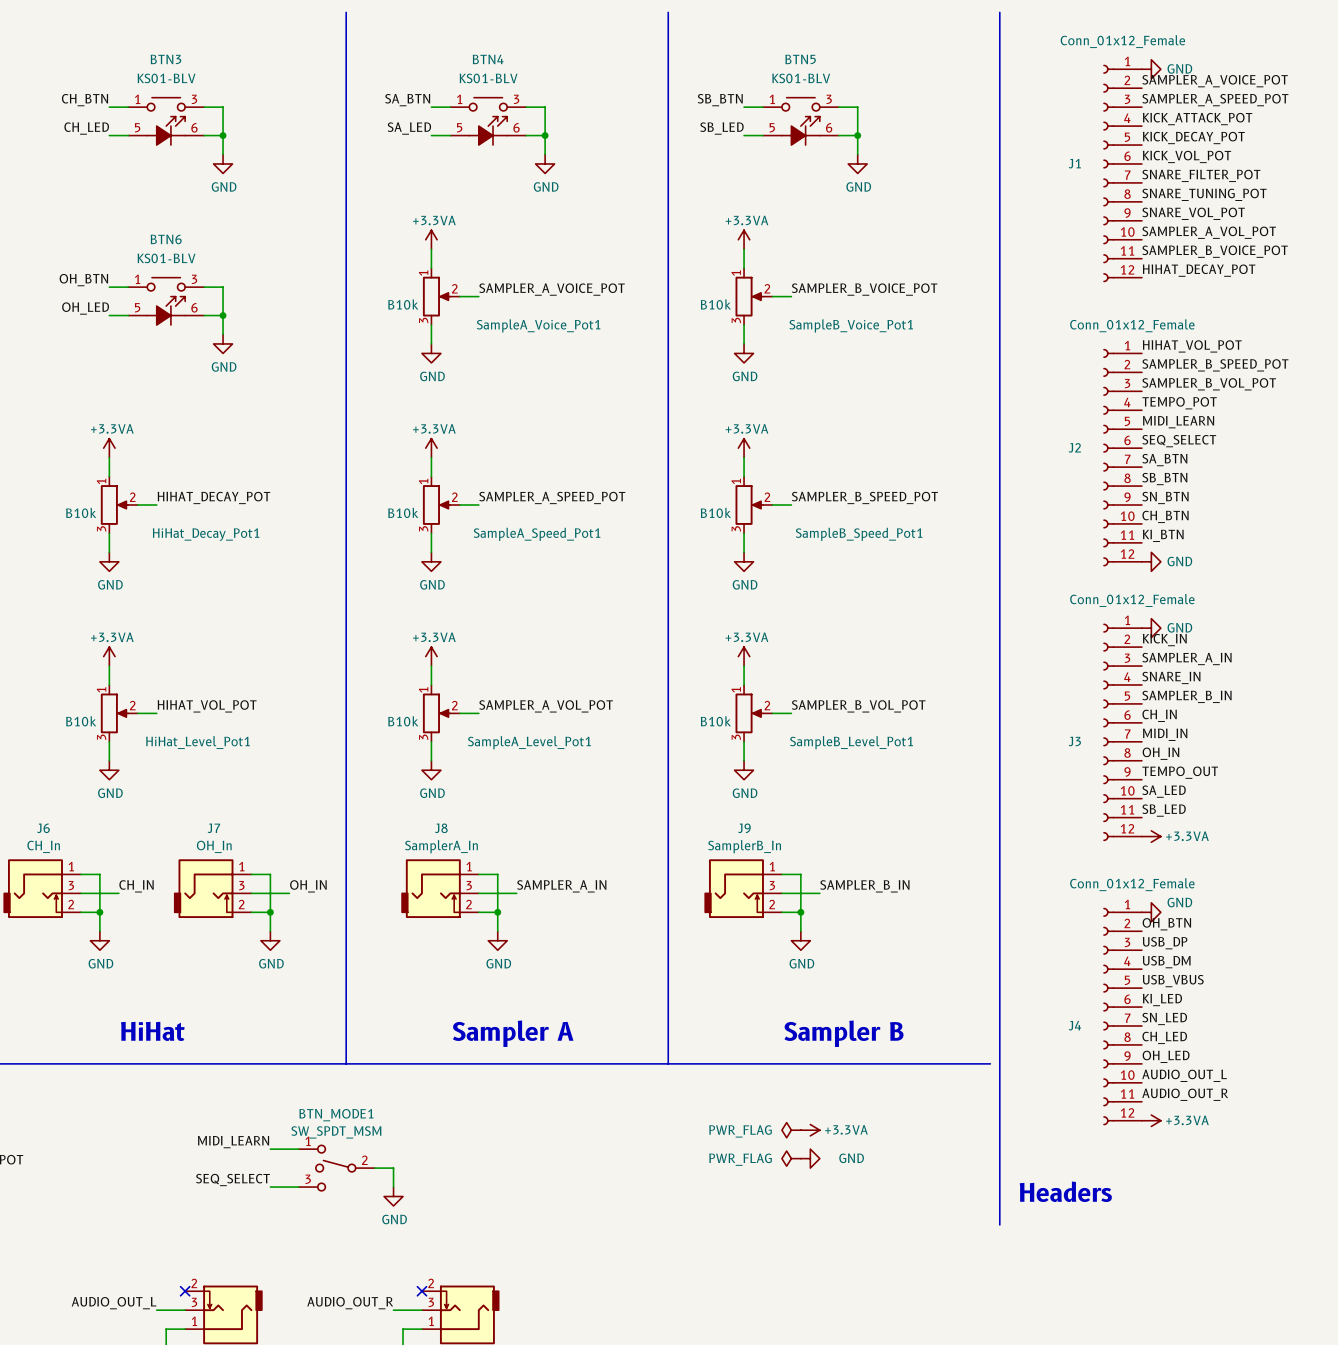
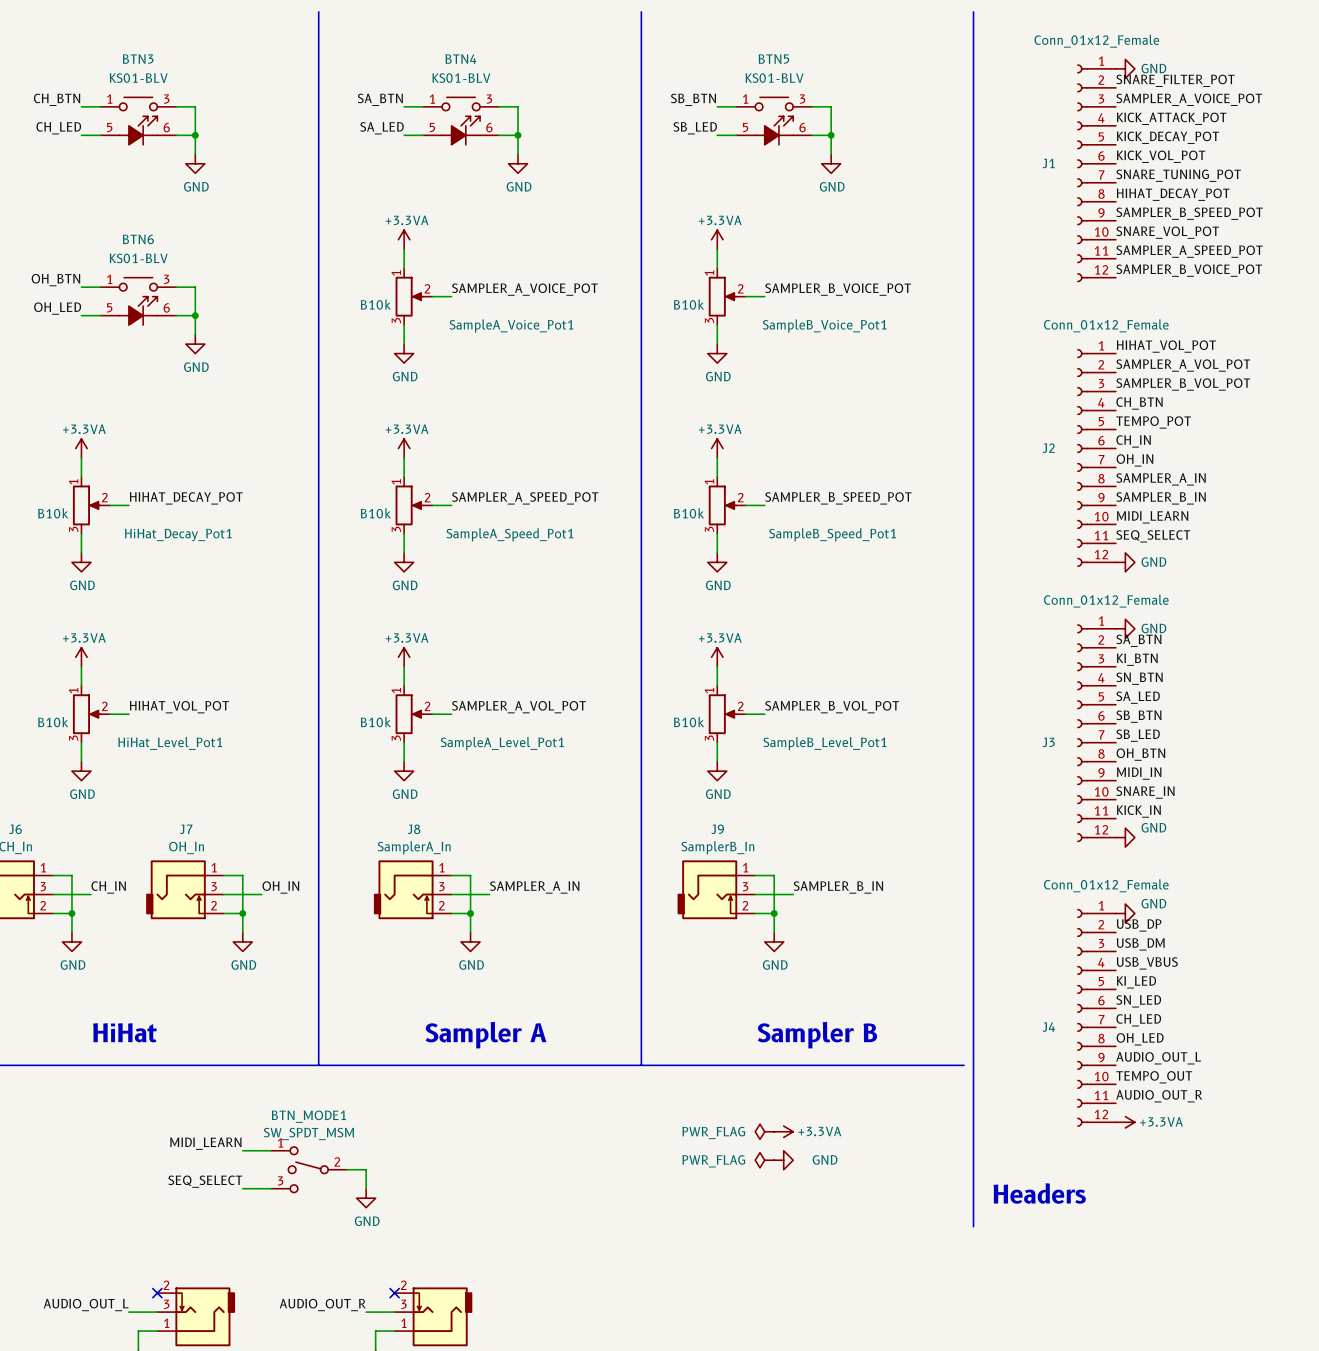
label: SAMPLER_A_VOICE_POT (1215, 81) -> SNARE_FILTER_POT (1175, 80)
label: SAMPLER_A_SPEED_POT (1215, 100) -> SAMPLER_A_VOICE_POT (1189, 99)
label: SNARE_FILTER_POT (1201, 175) -> SNARE_TUNING_POT (1178, 175)
label: SNARE_TUNING_POT (1204, 194) -> HIHAT_DECAY_POT (1173, 194)
label: SNARE_VOL_POT (1193, 213) -> SAMPLER_B_SPEED_POT (1189, 213)
label: SAMPLER_A_VOL_POT (1209, 232) -> SNARE_VOL_POT (1167, 232)
label: SAMPLER_B_VOICE_POT (1215, 251) -> SAMPLER_A_SPEED_POT (1189, 251)
label: HIHAT_DECAY_POT (1199, 270) -> SAMPLER_B_VOICE_POT (1189, 270)
label: SAMPLER_B_SPEED_POT (1215, 365) -> SAMPLER_A_VOL_POT (1183, 365)
label: TEMPO_POT (1179, 403) -> CH_BTN (1139, 403)
label: MIDI_LEARN (1178, 422) -> TEMPO_POT (1153, 422)
label: SEQ_SELECT (1179, 441) -> CH_IN (1133, 441)
label: SA_BTN (1164, 460) -> OH_IN (1134, 460)
label: SB_BTN (1164, 479) -> SAMPLER_A_IN (1161, 479)
label: SN_BTN (1165, 497) -> SAMPLER_B_IN (1161, 498)
label: CH_BTN (1165, 516) -> MIDI_LEARN (1152, 517)
label: KI_BTN (1163, 535) -> SEQ_SELECT (1153, 536)
label: KICK_IN (1164, 640) -> SA_BTN (1138, 640)
label: SAMPLER_A_IN (1186, 659) -> KI_BTN (1137, 659)
label: SNARE_IN (1171, 677) -> SN_BTN (1139, 678)
label: SAMPLER_B_IN (1186, 696) -> SA_LED (1138, 697)
label: CH_IN (1159, 715) -> SB_BTN (1138, 716)
label: MIDI_IN (1165, 734) -> SB_LED (1138, 735)
label: OH_IN (1160, 753) -> OH_BTN (1140, 754)
label: TEMPO_OUT (1180, 772) -> MIDI_IN (1139, 773)
label: SA_LED (1164, 791) -> SNARE_IN (1145, 792)
label: SB_LED (1164, 810) -> KICK_IN (1138, 811)
power symbol: +3.3VA (1151, 836) -> GND (1125, 837)
label: OH_BTN (1166, 924) -> USB_DP (1139, 925)
label: USB_DP (1165, 943) -> USB_DM (1140, 944)
label: USB_DM (1166, 962) -> USB_VBUS (1147, 963)
label: USB_VBUS (1173, 981) -> KI_LED (1136, 982)
label: KI_LED (1162, 1000) -> SN_LED (1138, 1001)
label: SN_LED (1164, 1018) -> CH_LED (1138, 1020)
label: CH_LED (1164, 1037) -> OH_LED (1140, 1039)
label: OH_LED (1166, 1056) -> AUDIO_OUT_L (1158, 1058)
label: AUDIO_OUT_L (1184, 1075) -> TEMPO_OUT (1154, 1077)

